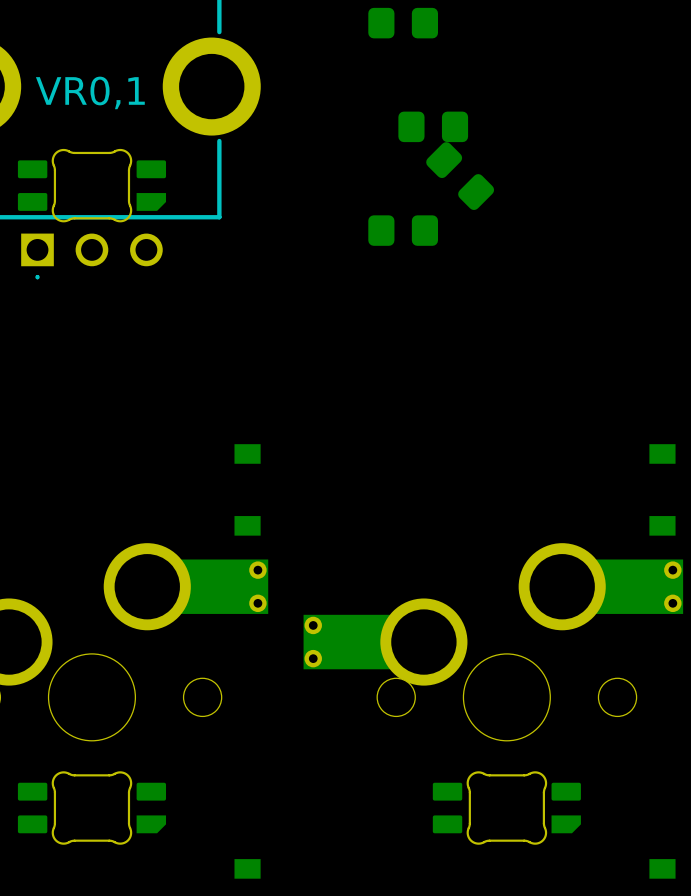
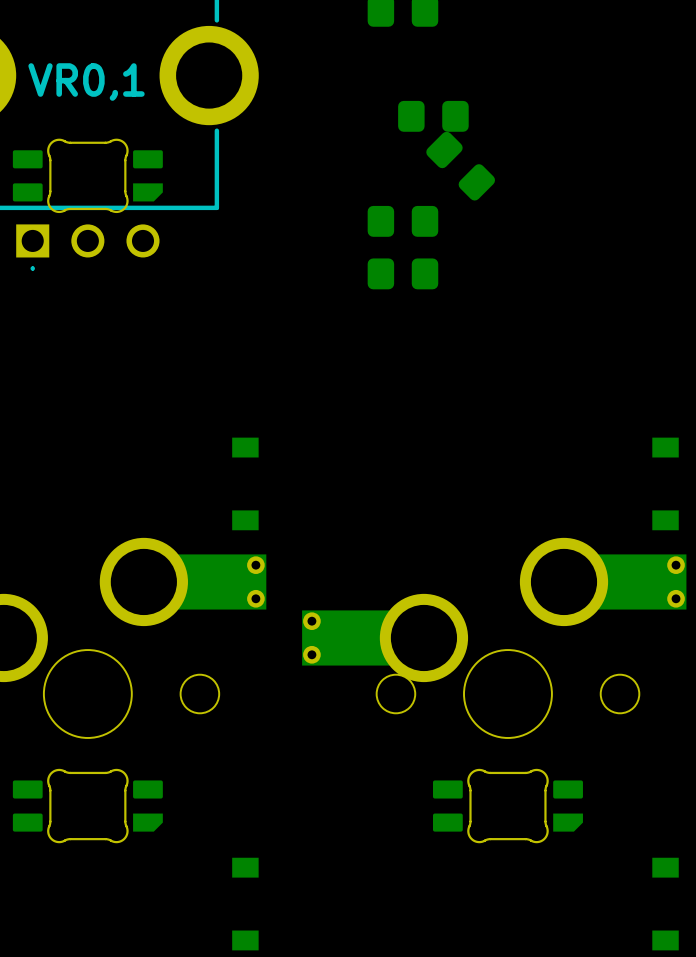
part: none -> (402, 273)

